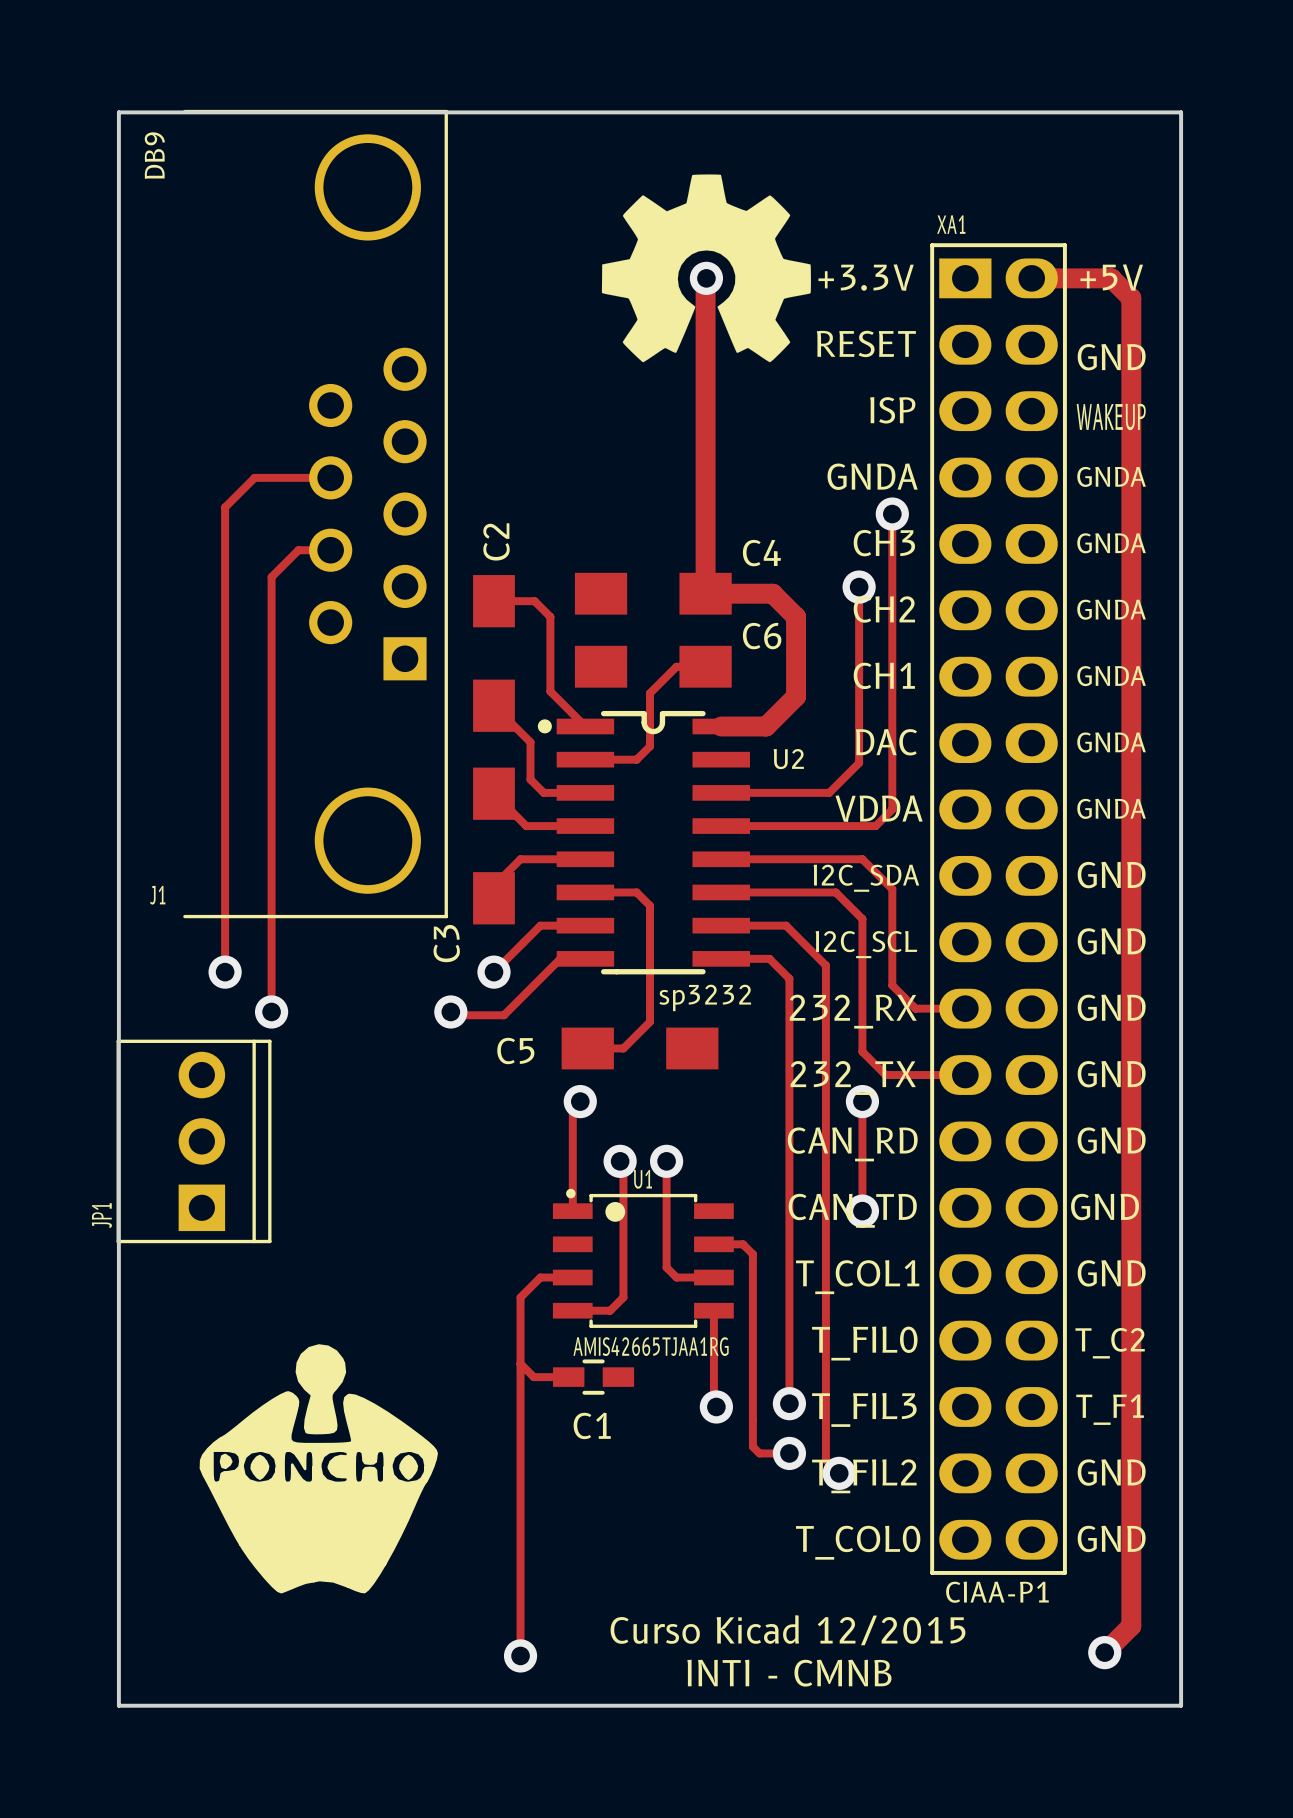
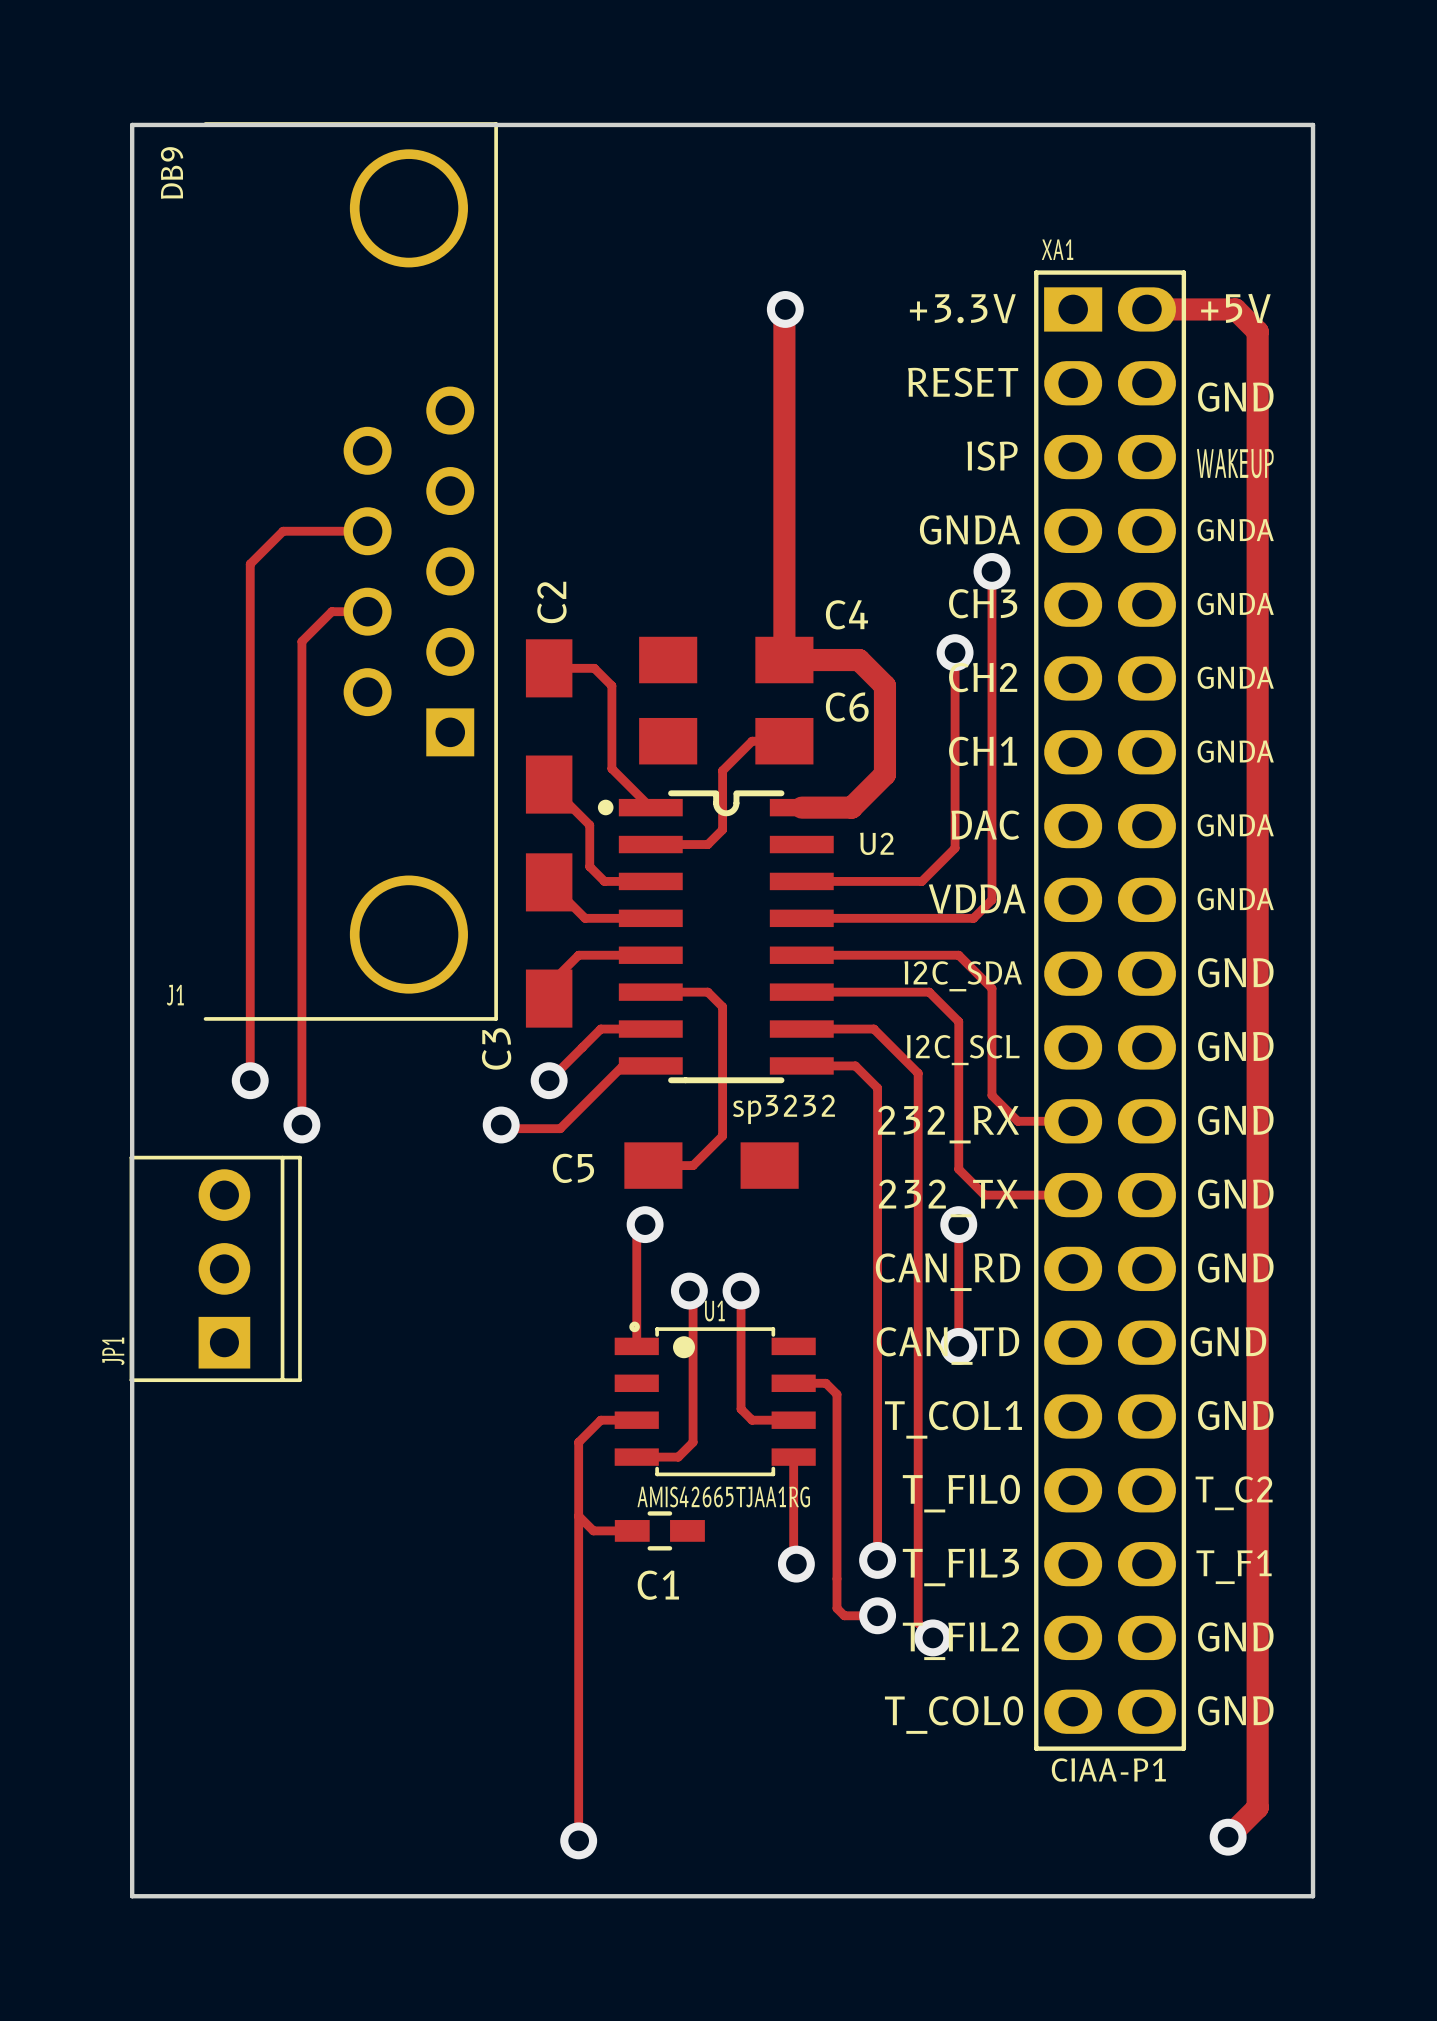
drawing: [601, 174, 811, 363] -> none
drawing: [199, 1344, 438, 1594] -> none
text: Curso Kicad 12/2015 (788, 1630) -> none
text: INTI - CMNB (789, 1673) -> none

